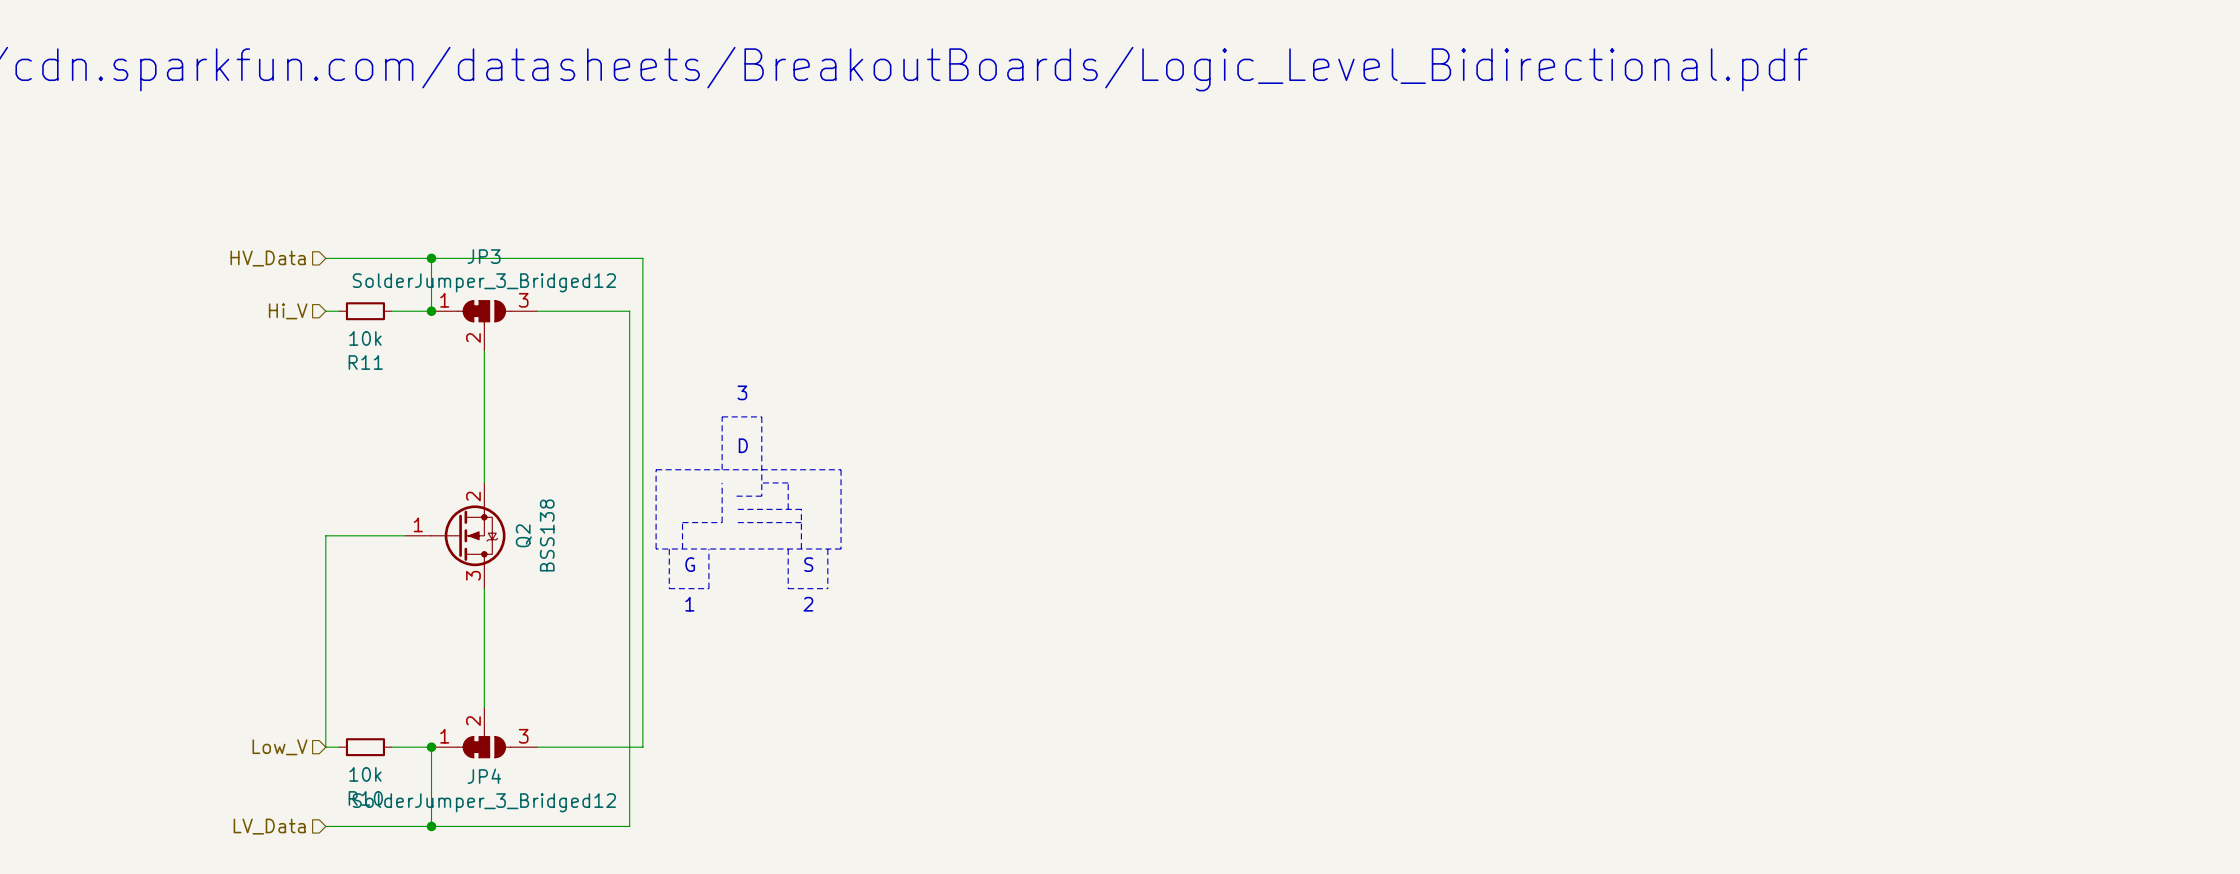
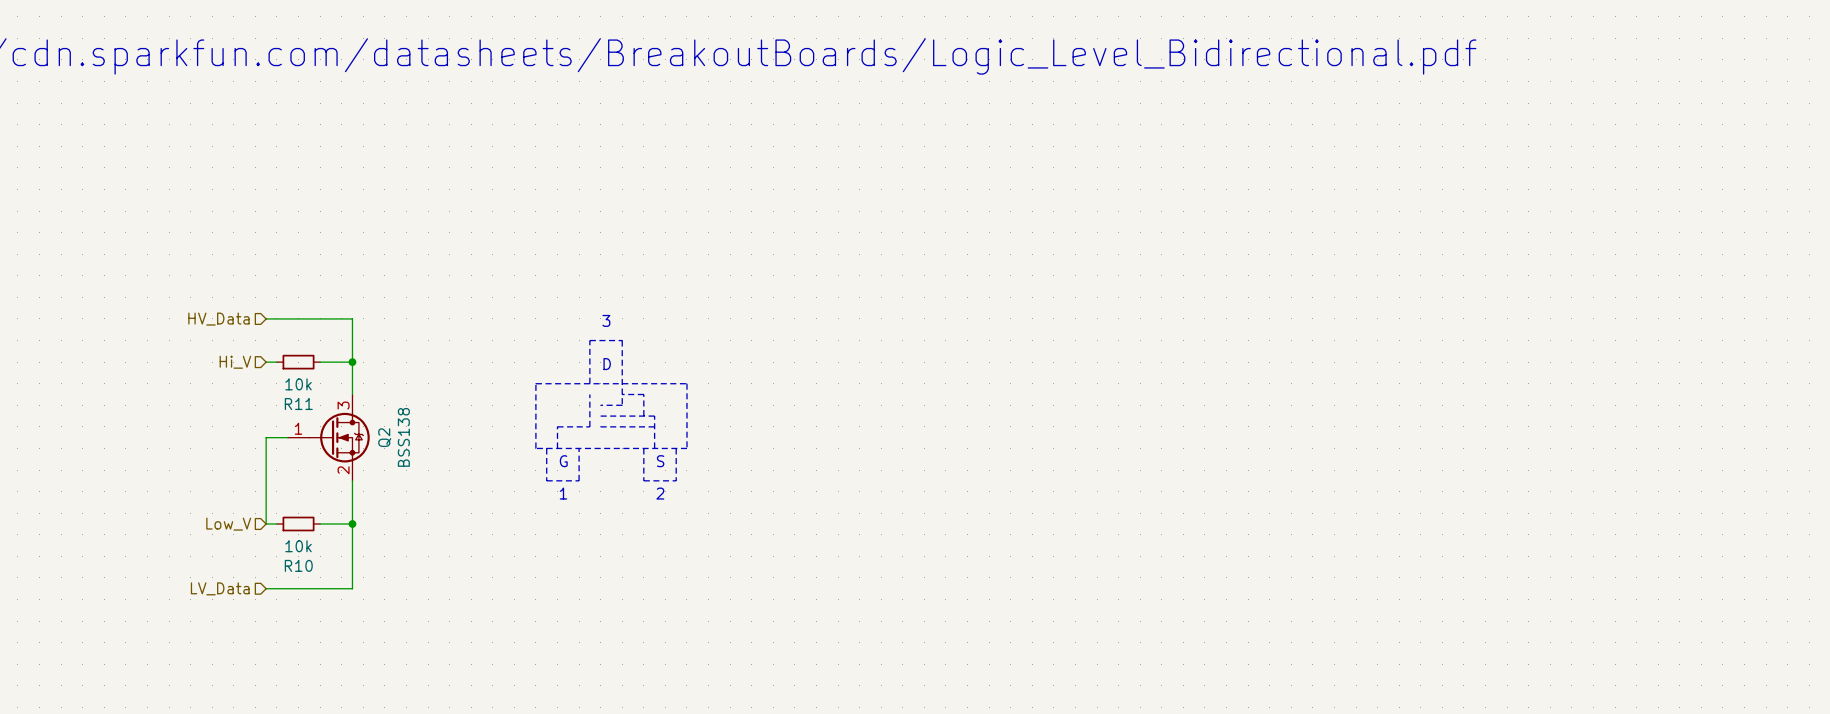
hierarchical label position: HV_Data (268, 258) -> HV_Data (218, 319)
wire: (325, 258) (642, 258) (642, 747) (537, 747) -> none
wire: (431, 258) (431, 311) (391, 311) -> none
junction: (431, 258) -> none
hierarchical label position: Hi_V (288, 311) -> Hi_V (235, 362)
wire: (325, 311) (339, 311) -> (266, 362) (276, 362)
R11 position: (365, 311) -> (298, 362)
junction: (431, 311) -> none
wire: (537, 311) (629, 311) (629, 826) (325, 826) -> none
JP3: SolderJumper_3_Bridged12 (484, 325) -> none
wire: (484, 350) (484, 482) -> none
wire: none -> (266, 318) (352, 318) (352, 394)
wire: none -> (320, 362) (352, 362)
junction: none -> (352, 362)
Q2 flip: as is (468, 535) -> up-down (339, 437)
wire: none -> (352, 480) (352, 588) (266, 588)
wire: (484, 588) (484, 707) -> none
wire: (325, 641) (325, 747) (339, 747) -> (266, 523) (276, 523)
wire: none -> (320, 523) (352, 523)
junction: none -> (352, 523)
JP4: SolderJumper_3_Bridged12 (484, 732) -> none
hierarchical label position: Low_V (280, 747) -> Low_V (228, 524)
R10 position: (365, 747) -> (298, 523)
wire: (391, 747) (431, 747) (431, 826) -> none
junction: (431, 747) -> none
hierarchical label position: LV_Data (269, 826) -> LV_Data (220, 588)
junction: (431, 826) -> none

